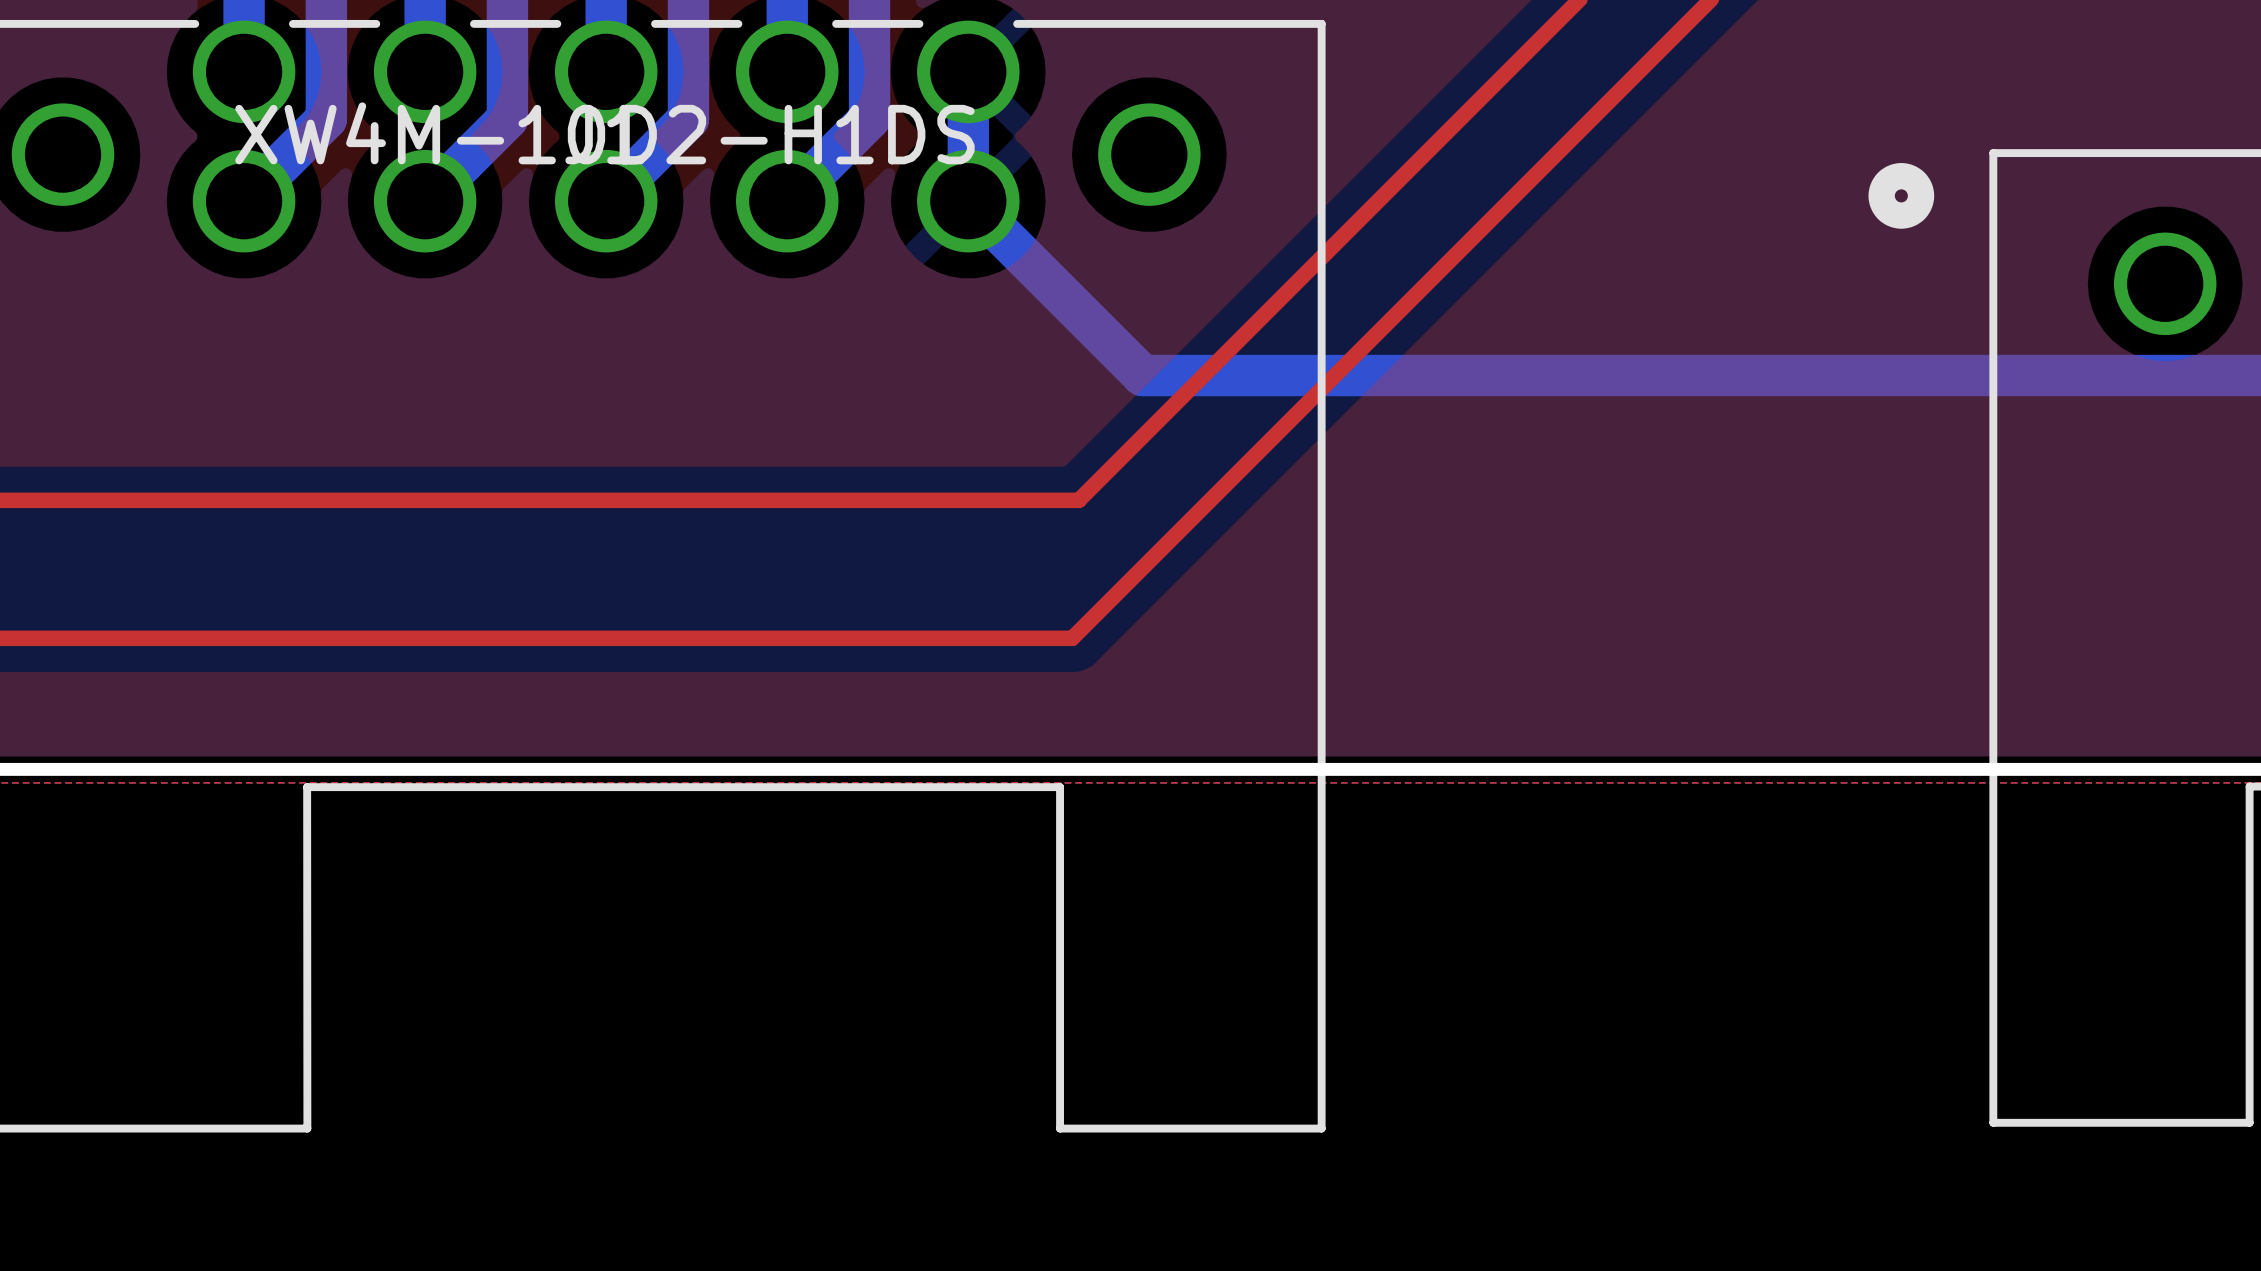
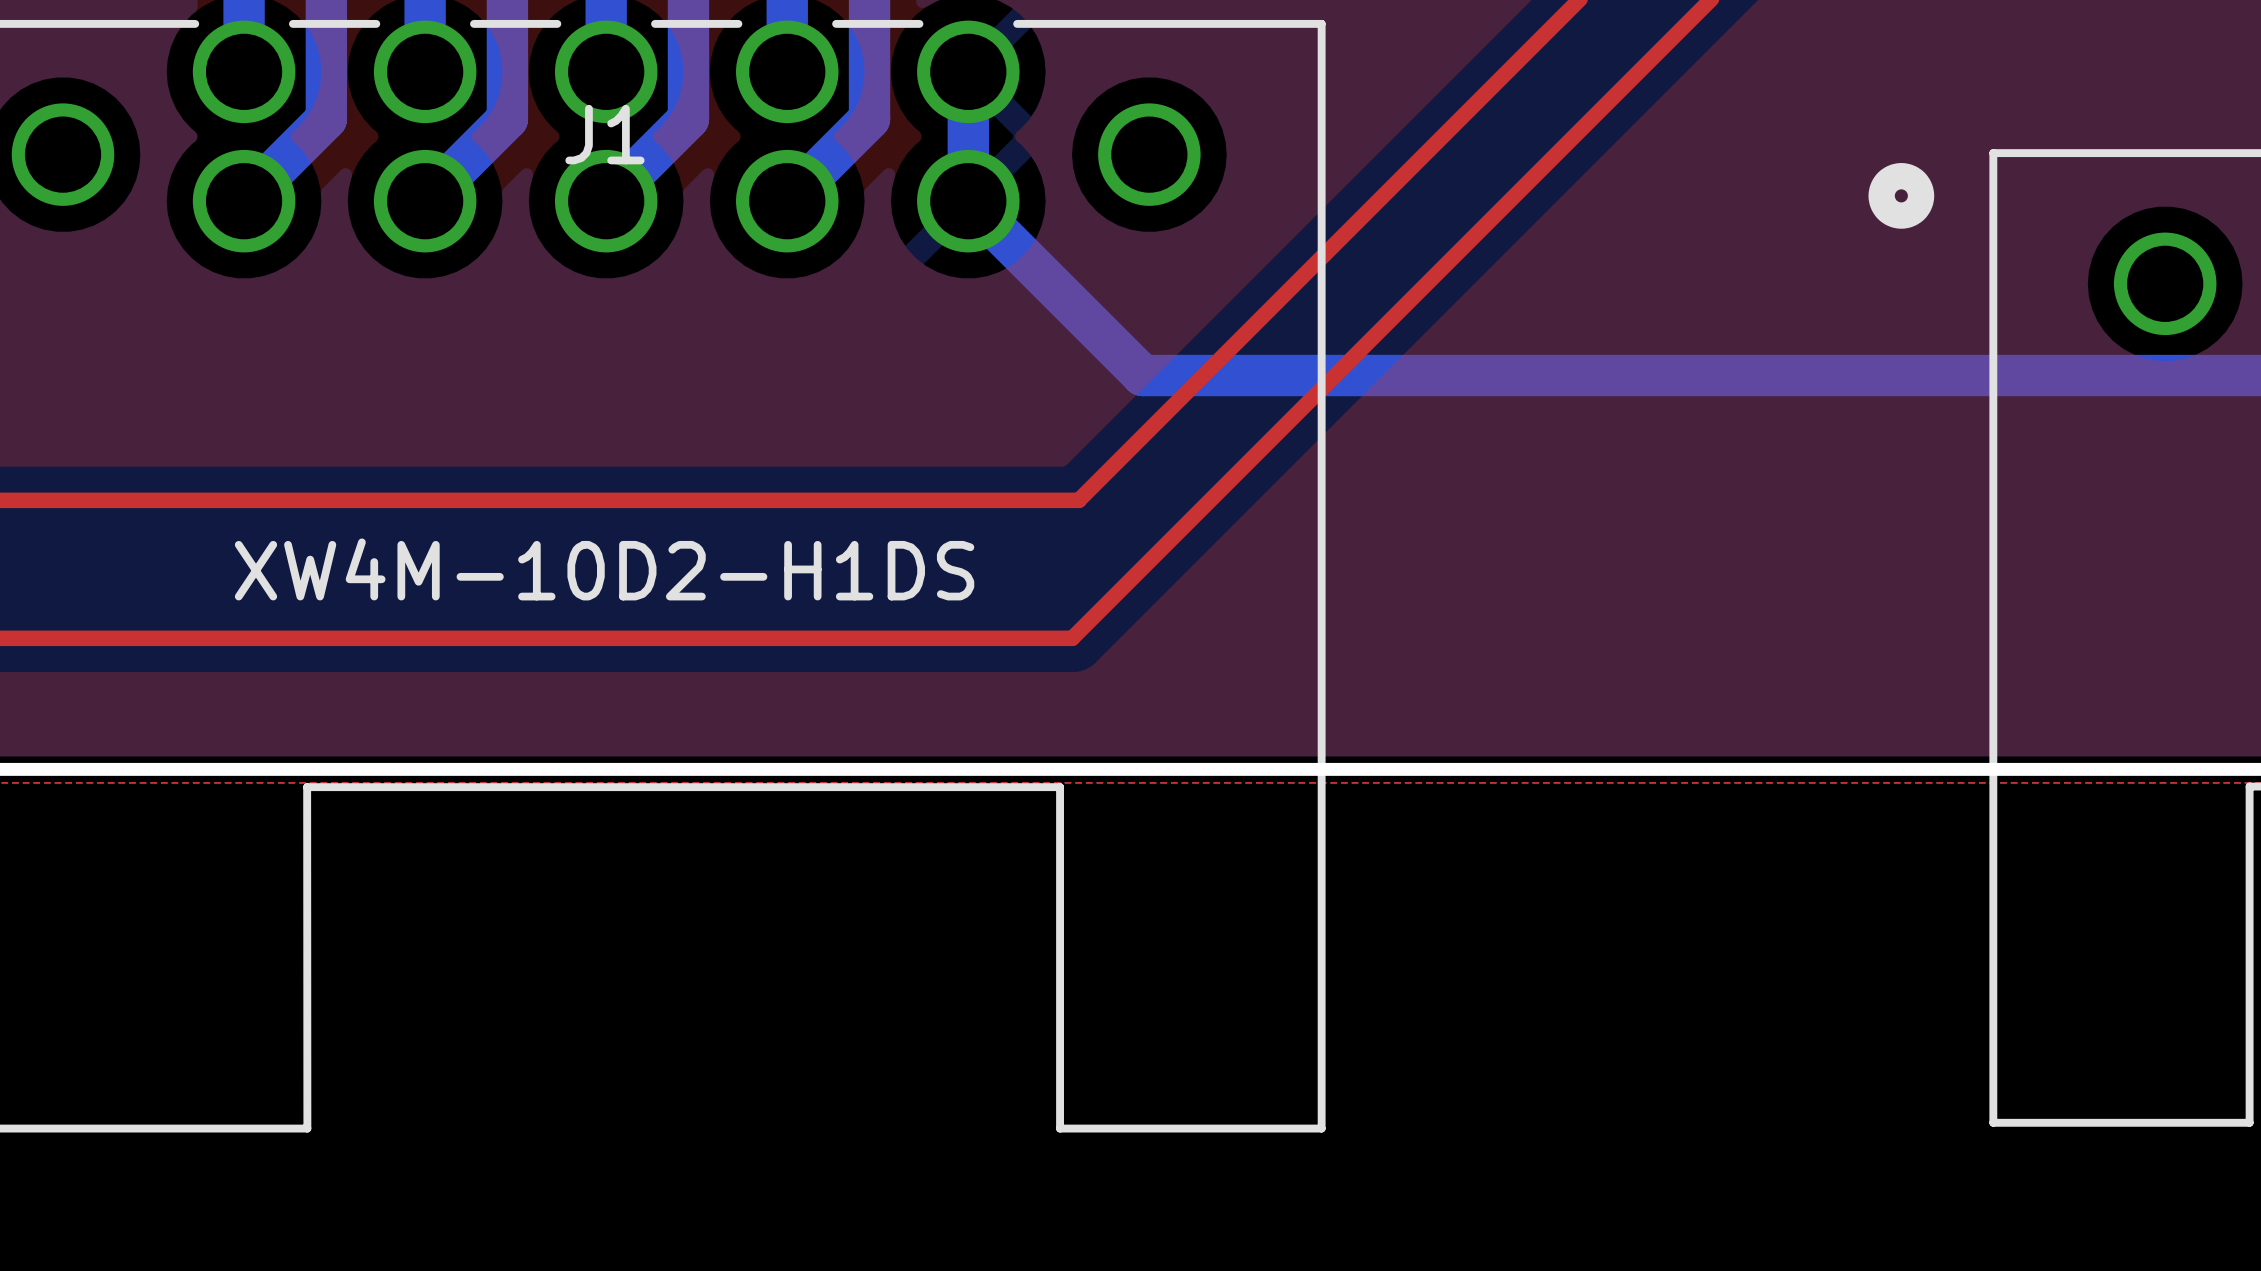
J1 value position: XW4M-10D2-H1DS (604, 133) -> XW4M-10D2-H1DS (604, 569)

